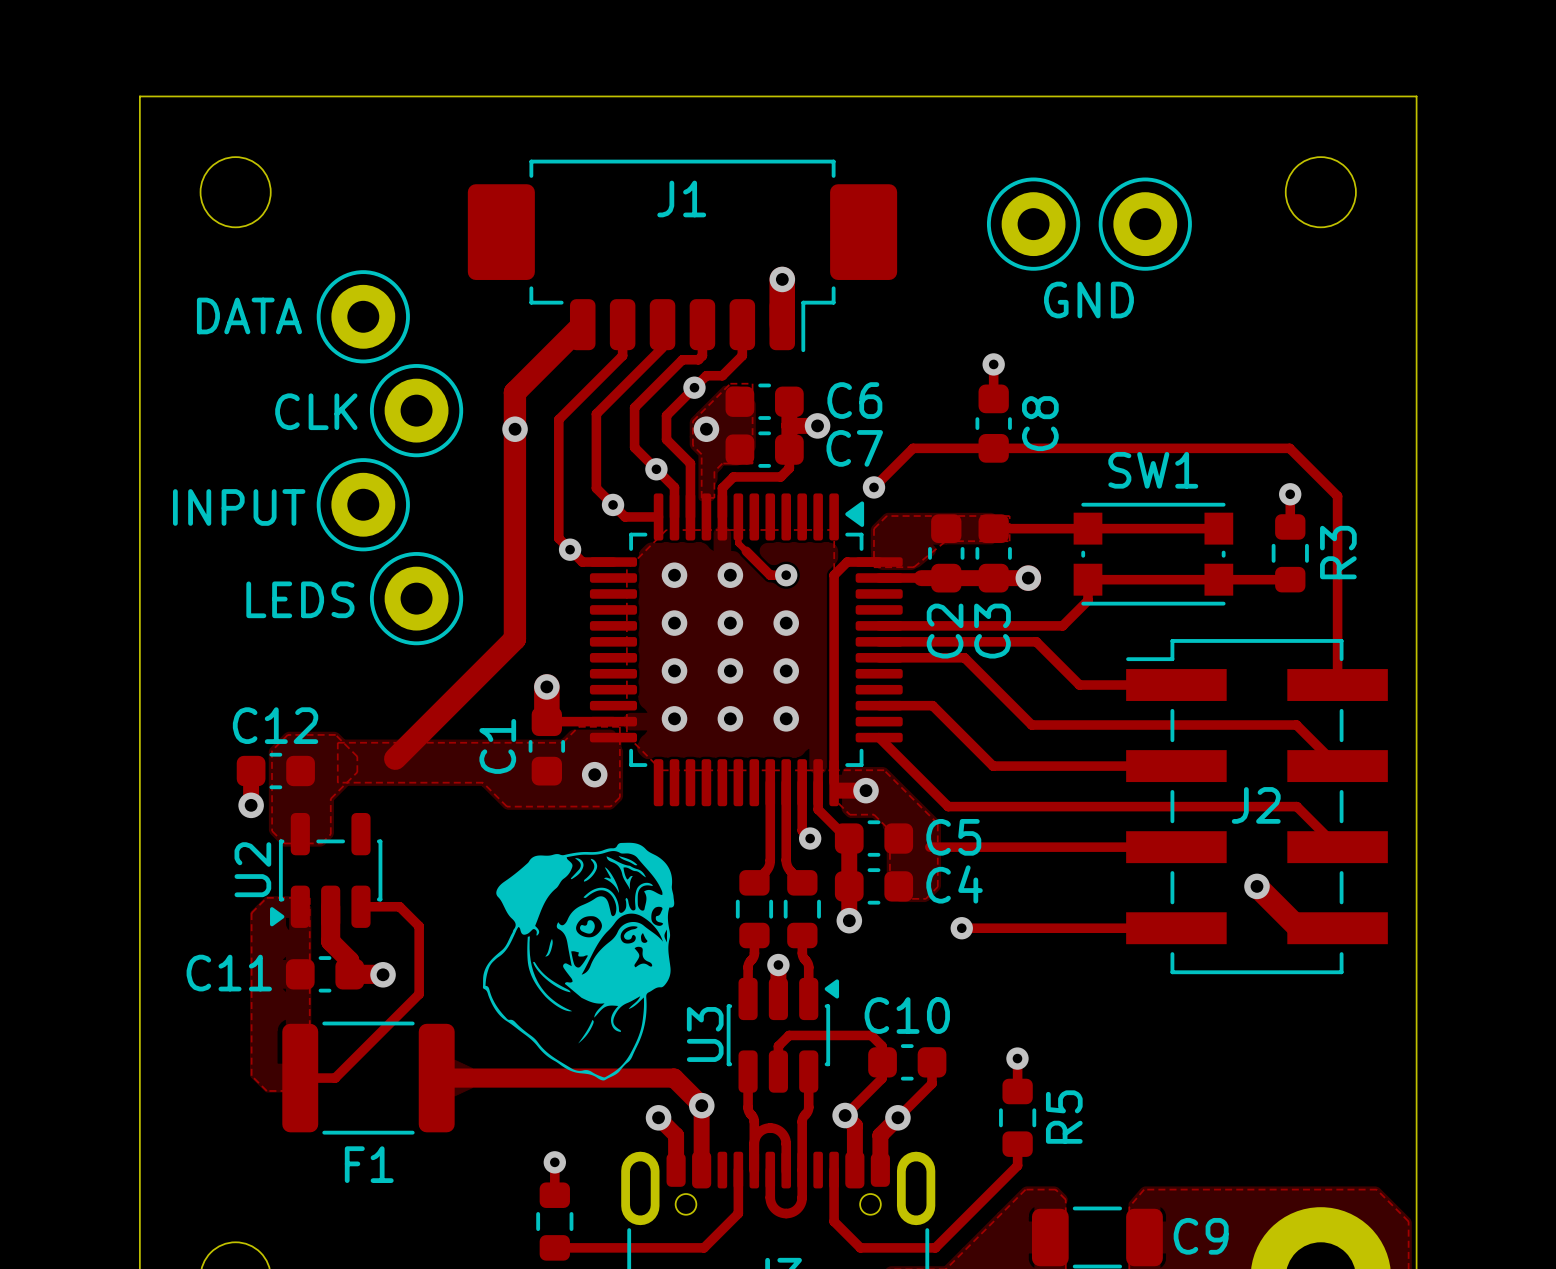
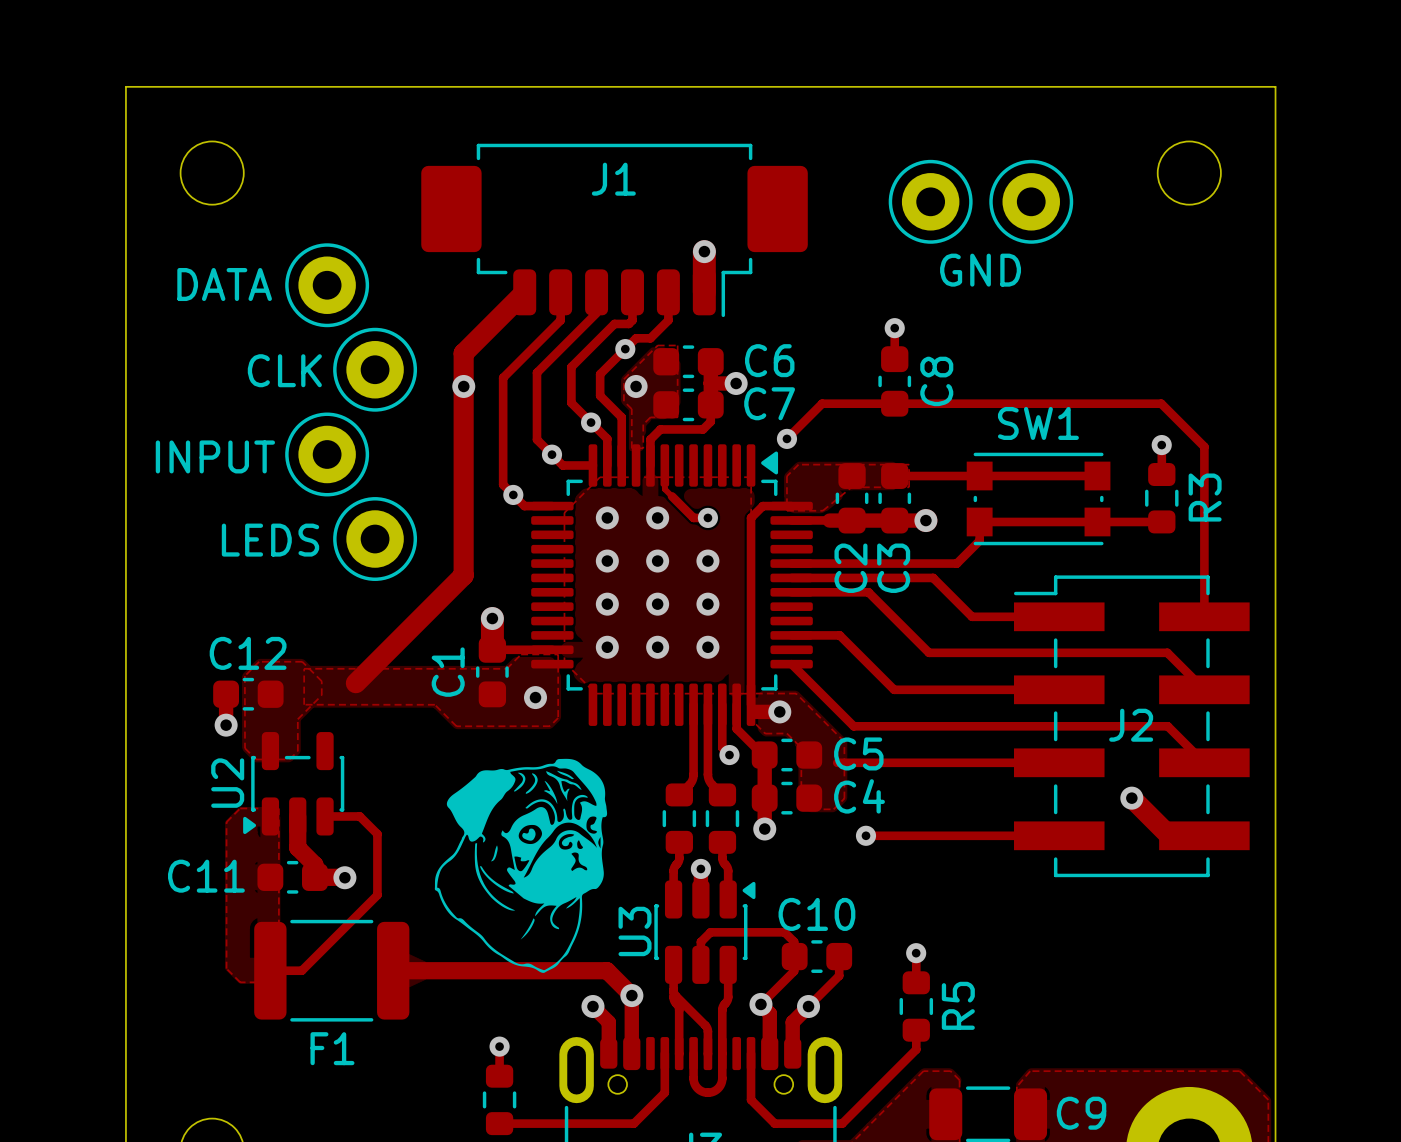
track: (754, 1143) (758, 1132) (770, 1127) (781, 1132) (785, 1137) (786, 1145) -> (673, 990) (675, 995) (705, 1026) (707, 1031)

